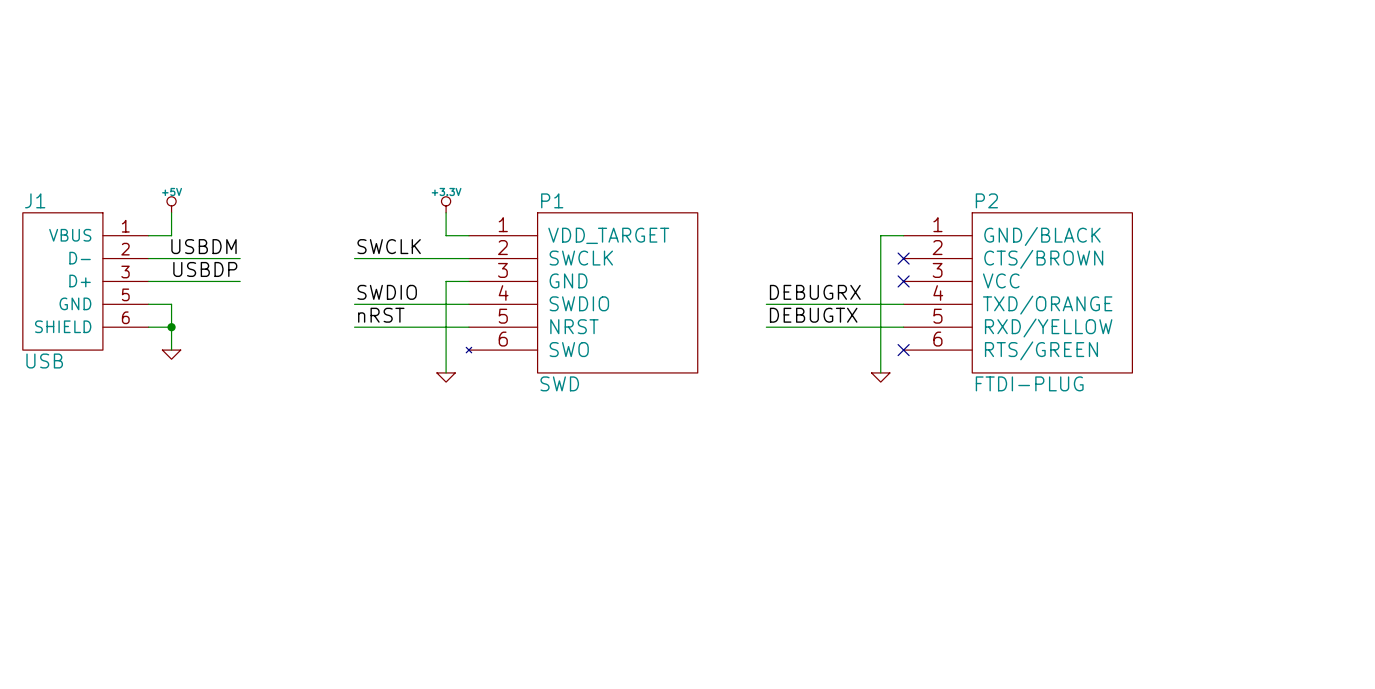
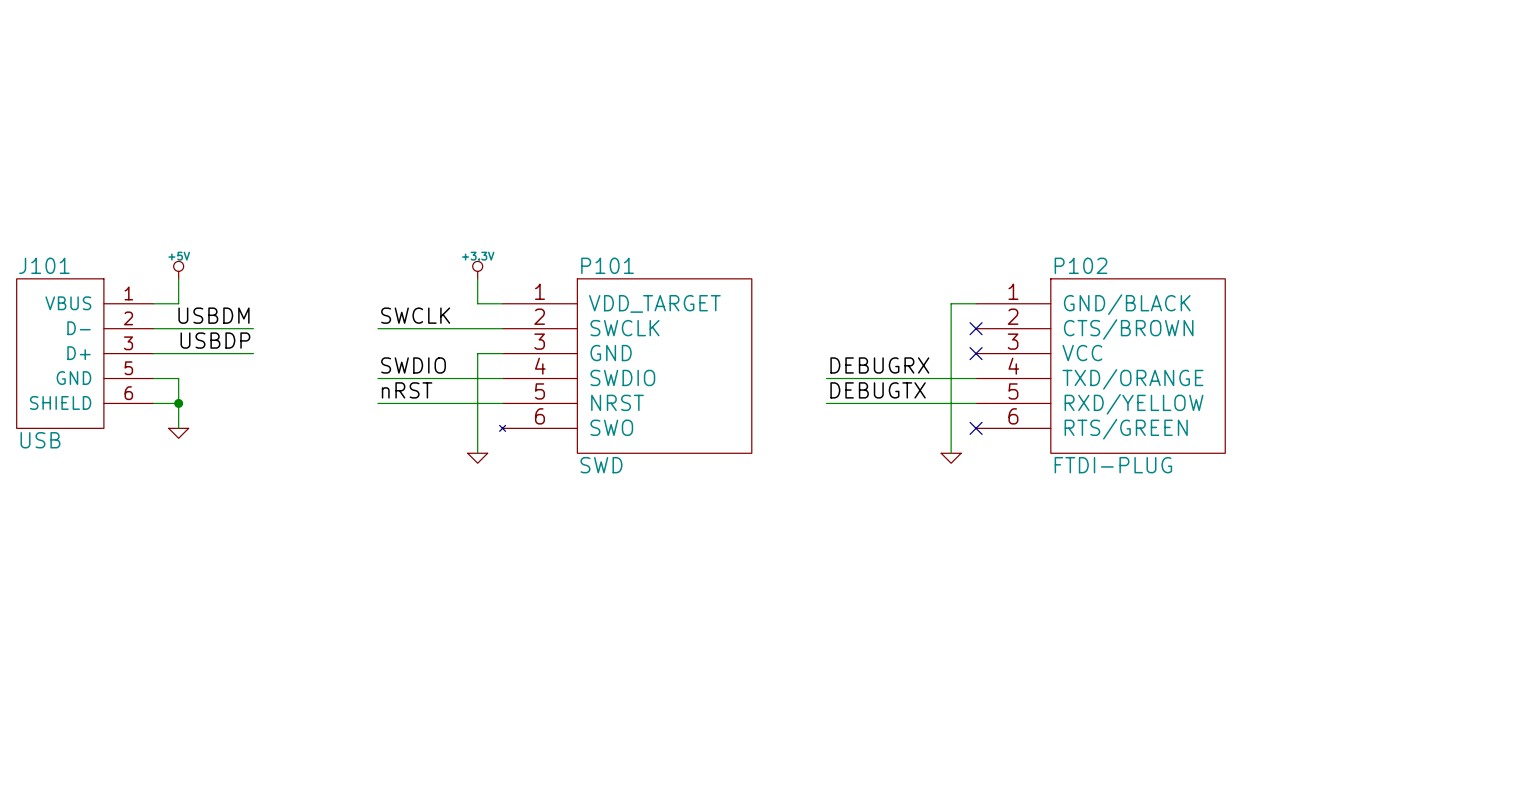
J1 name: J1 (35, 200) -> J101 (44, 265)
P1 name: P1 (552, 200) -> P101 (607, 265)
P2 name: P2 (986, 200) -> P102 (1080, 265)

